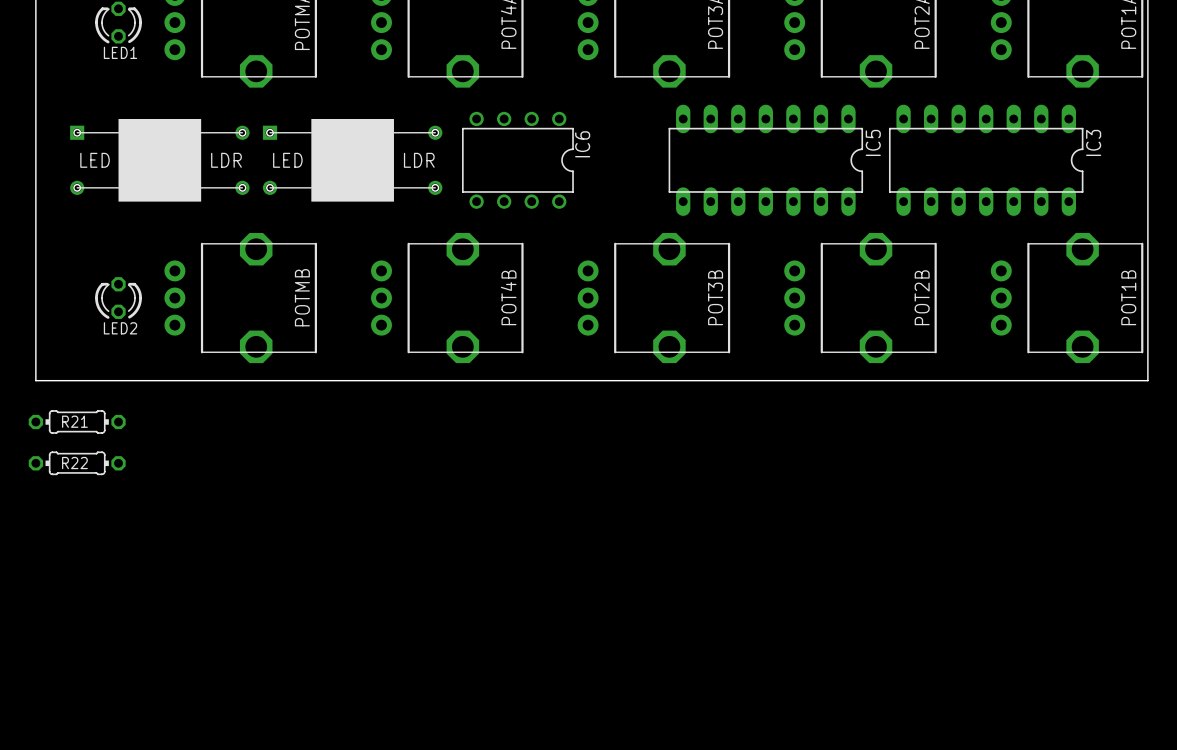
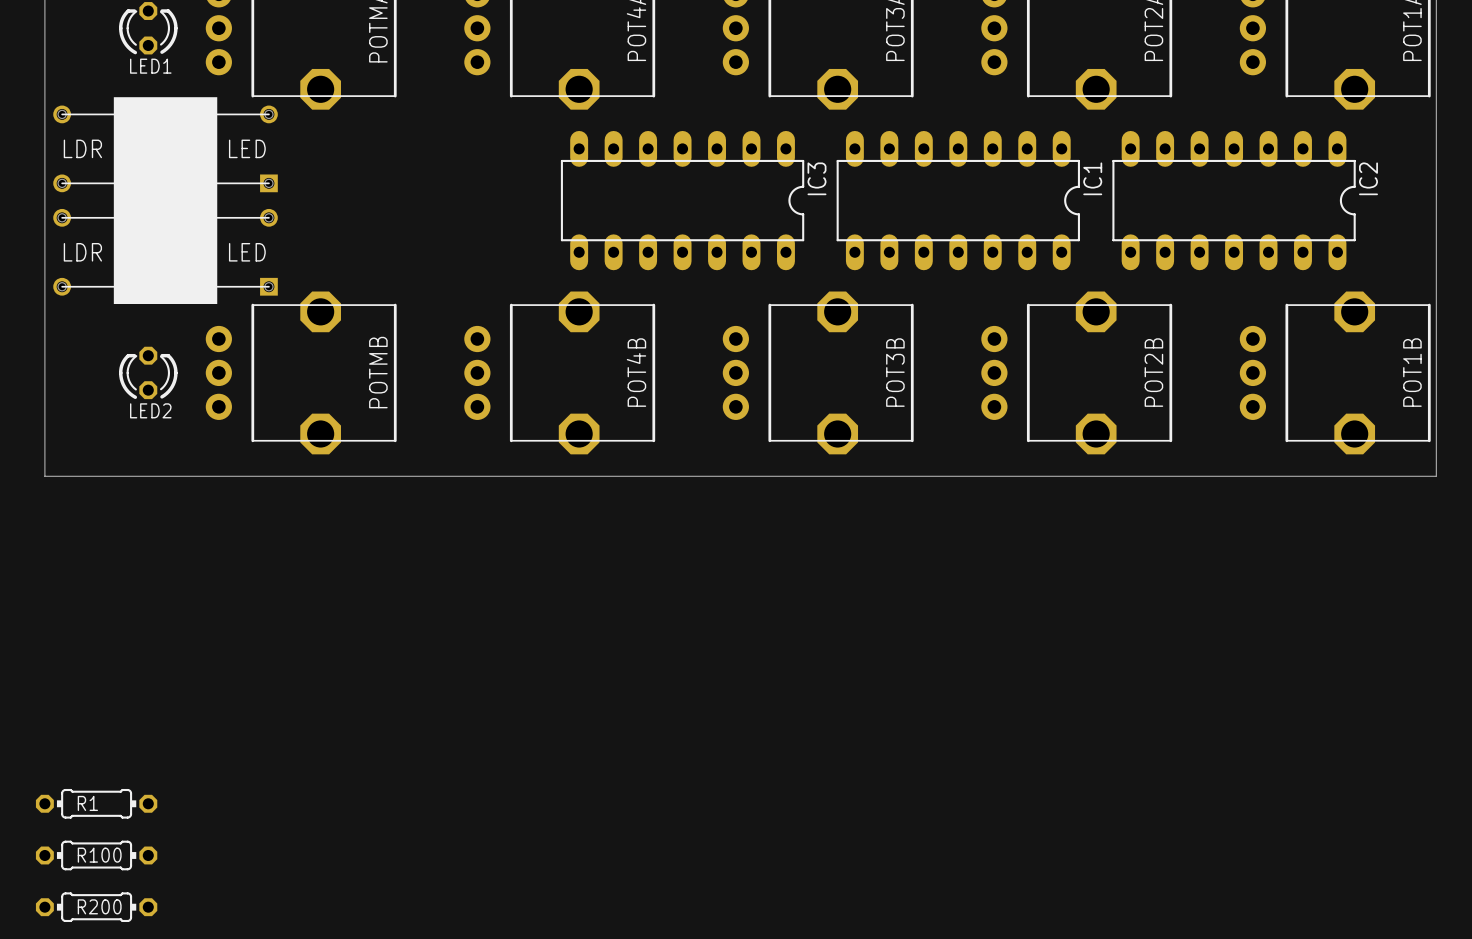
part: none -> (165, 148)
IC5 name: IC5 (873, 142) -> IC1 (1092, 178)
IC3 name: IC3 (1093, 142) -> IC2 (1368, 178)
part: (159, 160) -> none
part: (352, 160) -> none
IC6: (517, 160) -> none
IC3: none -> (682, 200)
part: none -> (165, 252)
R21: (77, 421) -> none
R22: (77, 463) -> none
R1: none -> (96, 803)
R100: none -> (96, 855)
R200: none -> (96, 907)

